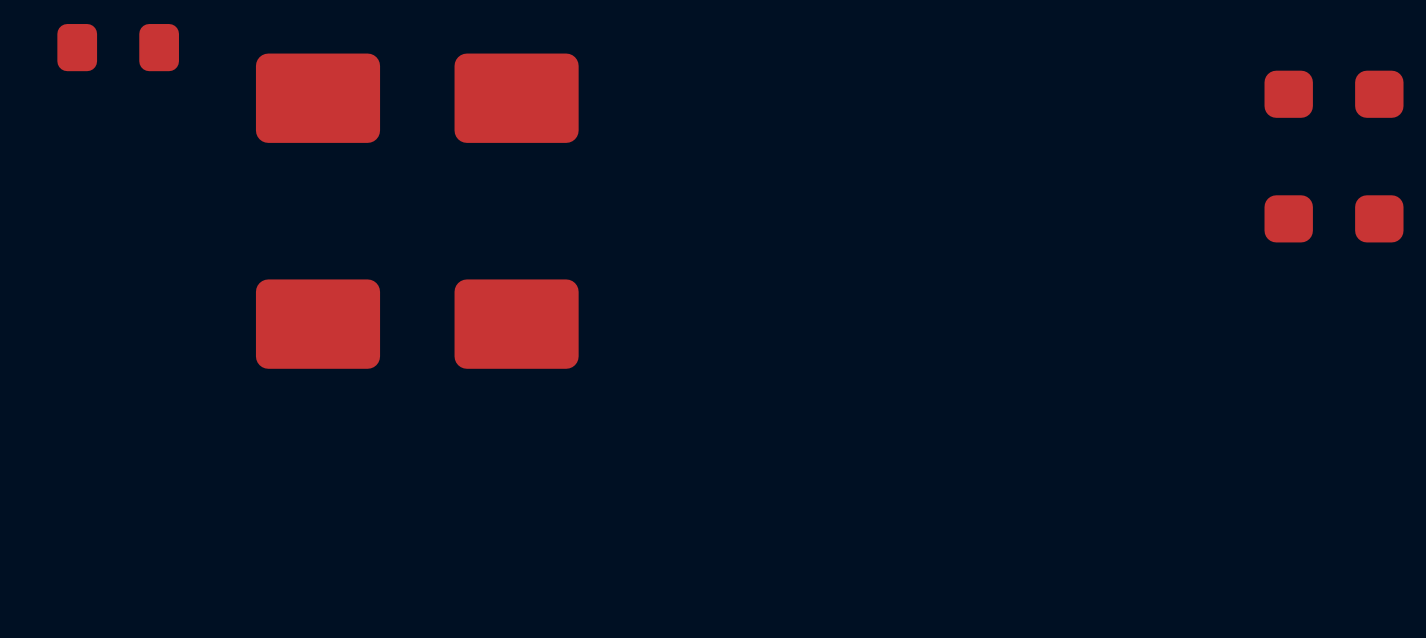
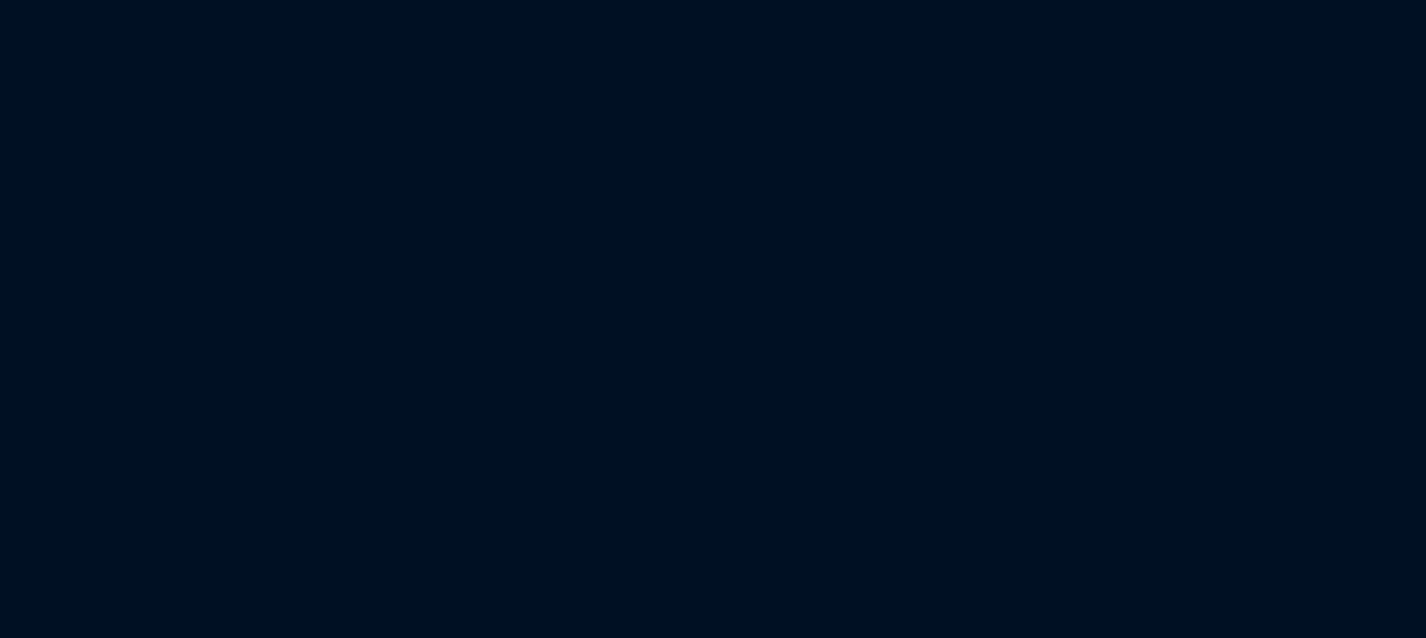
part: (118, 47) -> none
part: (1334, 94) -> none
part: (417, 98) -> none
part: (1334, 218) -> none
part: (417, 324) -> none

